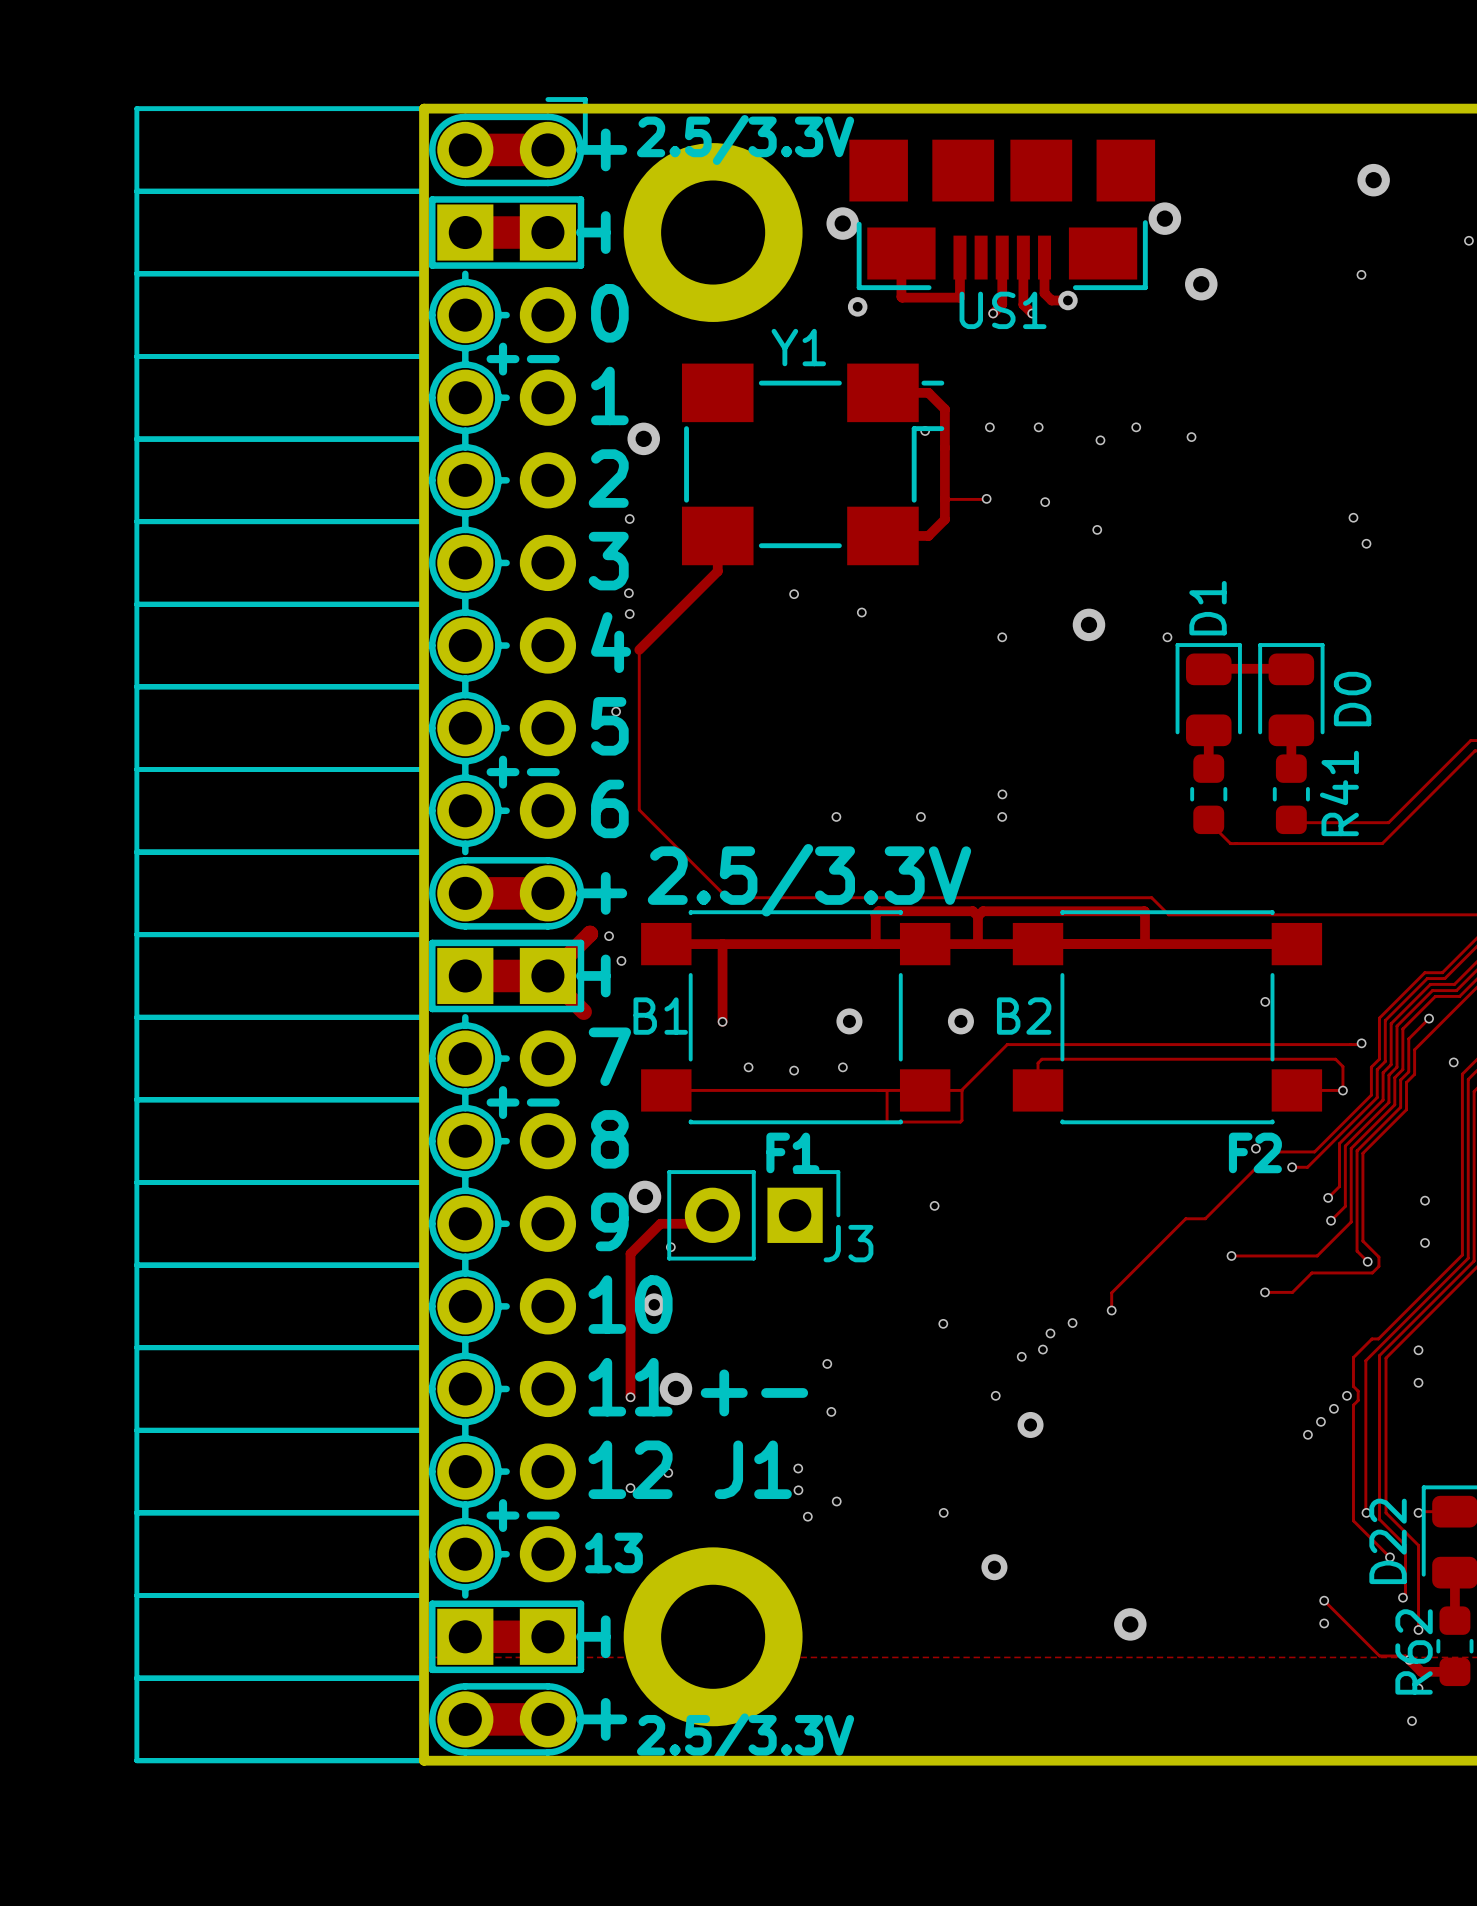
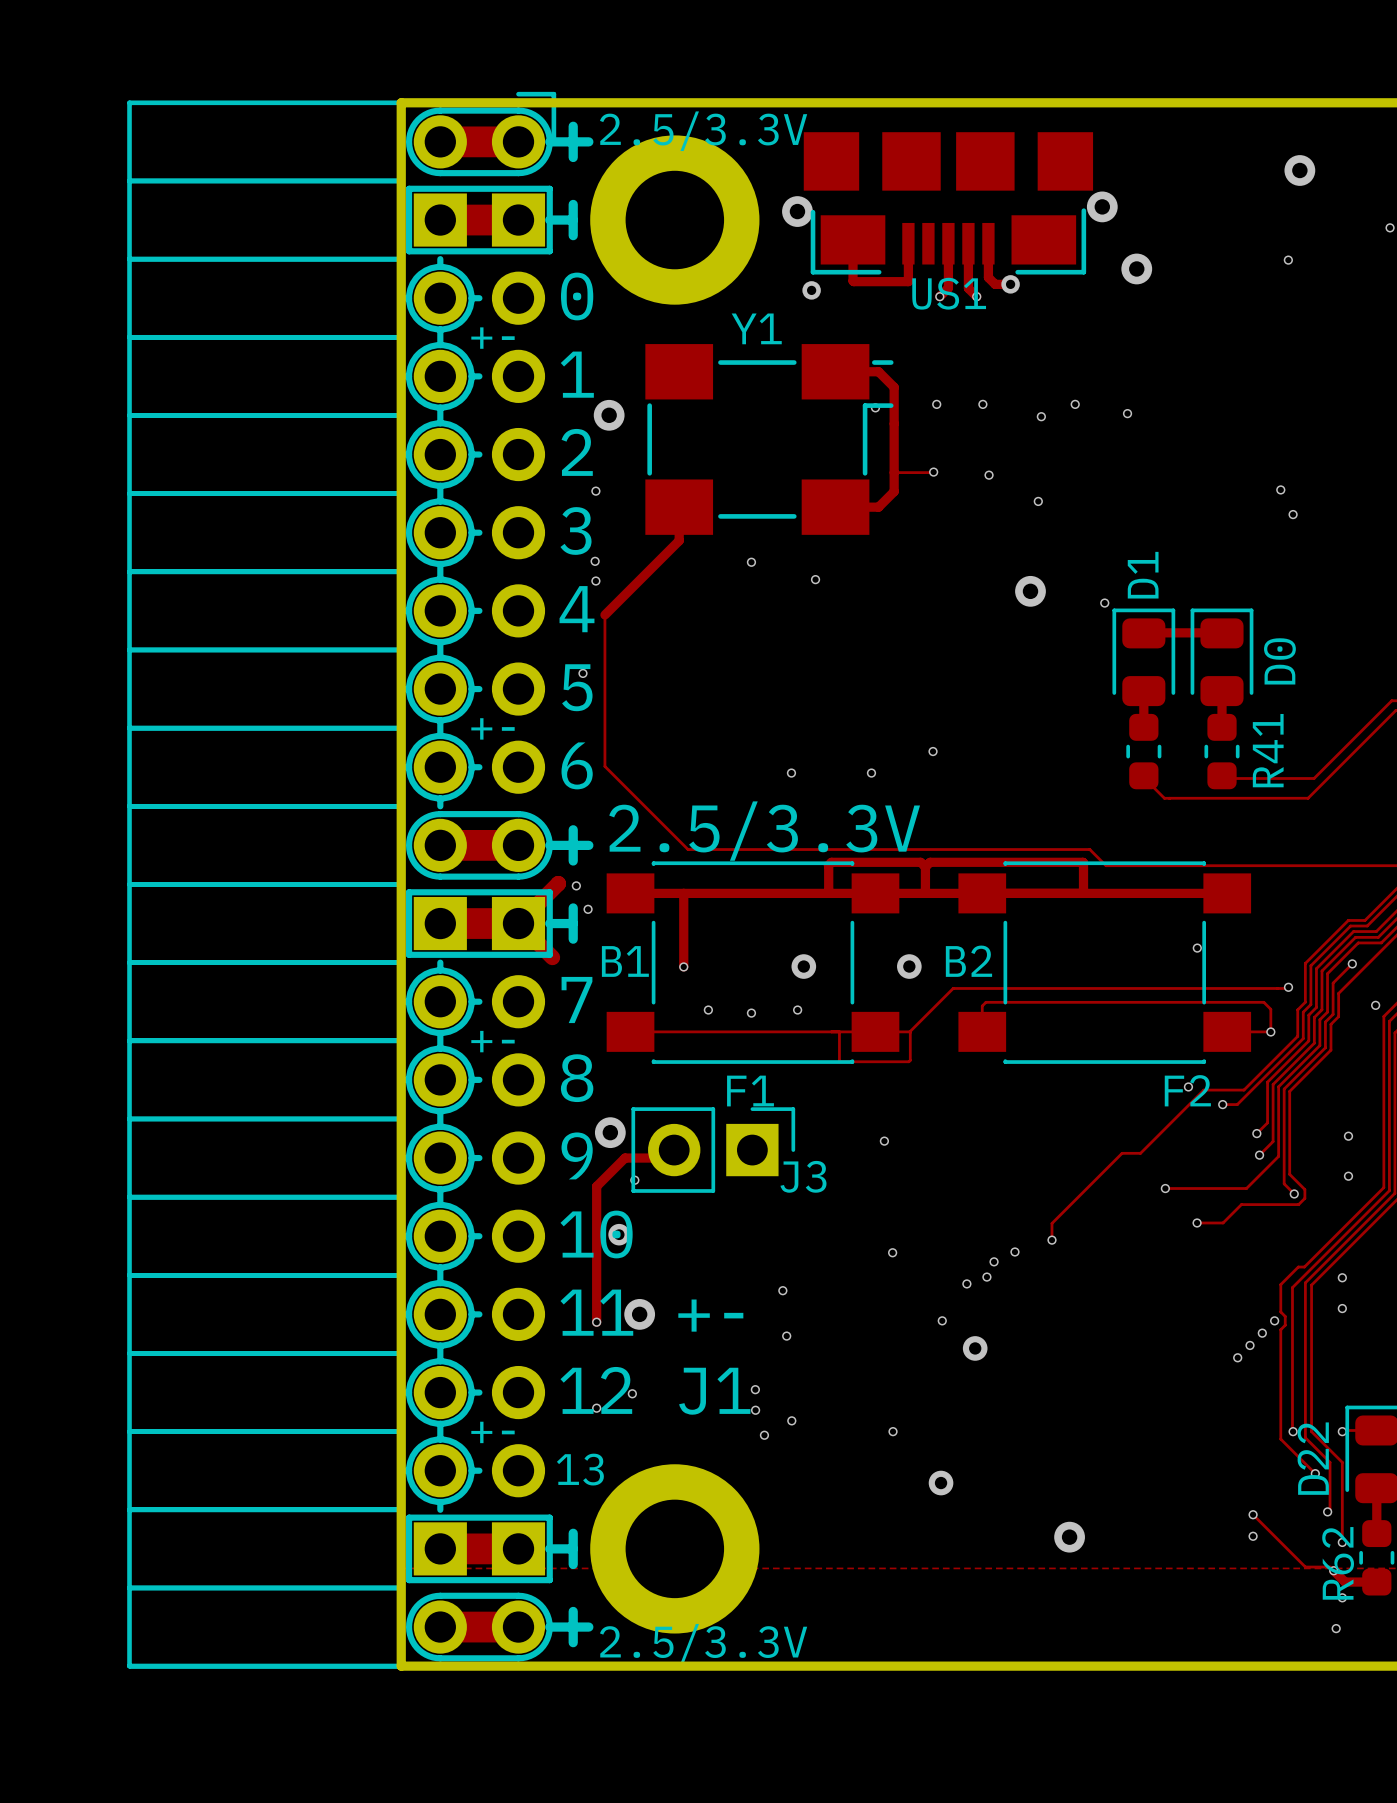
via: (1002, 637) -> none
via: none -> (933, 751)
via: (1002, 794) -> none
via: (1002, 816) -> none

